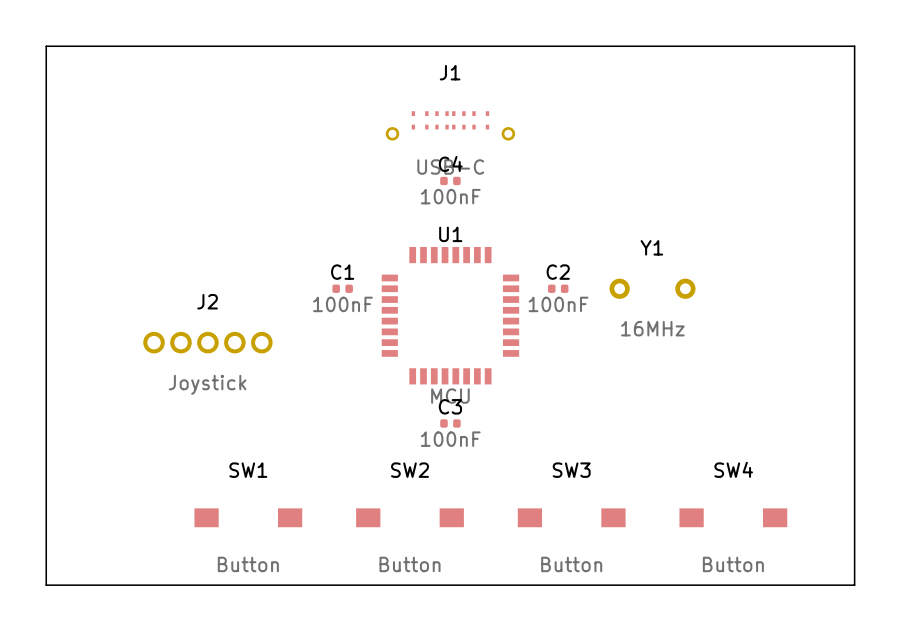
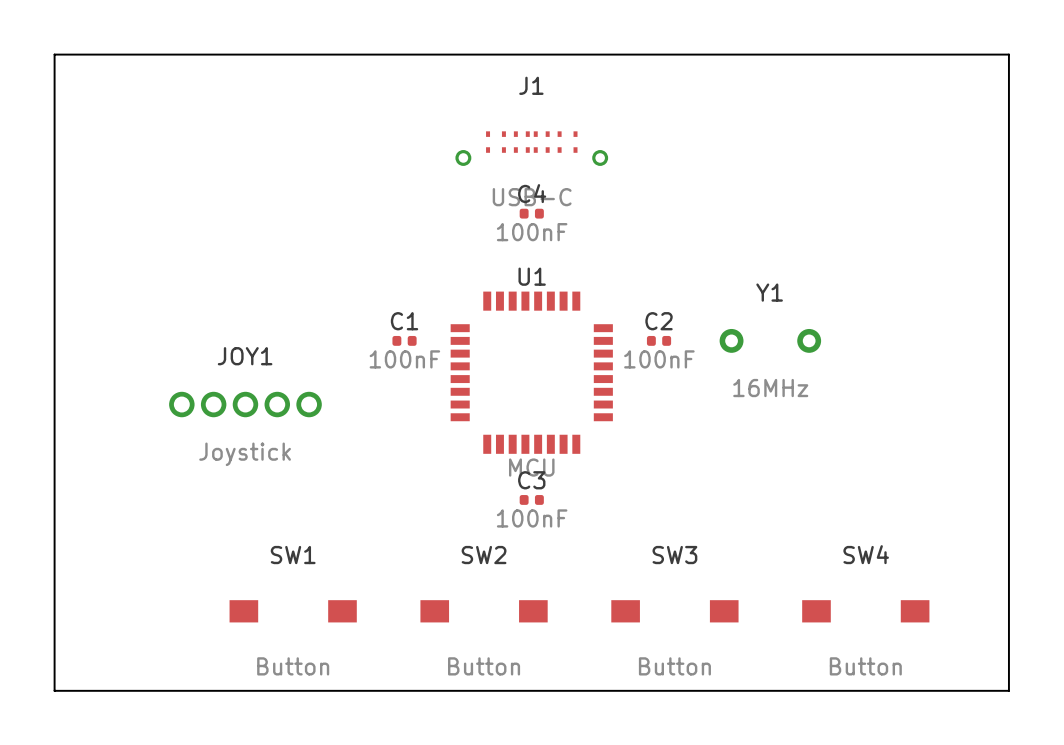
J2 name: J2 (207, 301) -> JOY1 (245, 356)

